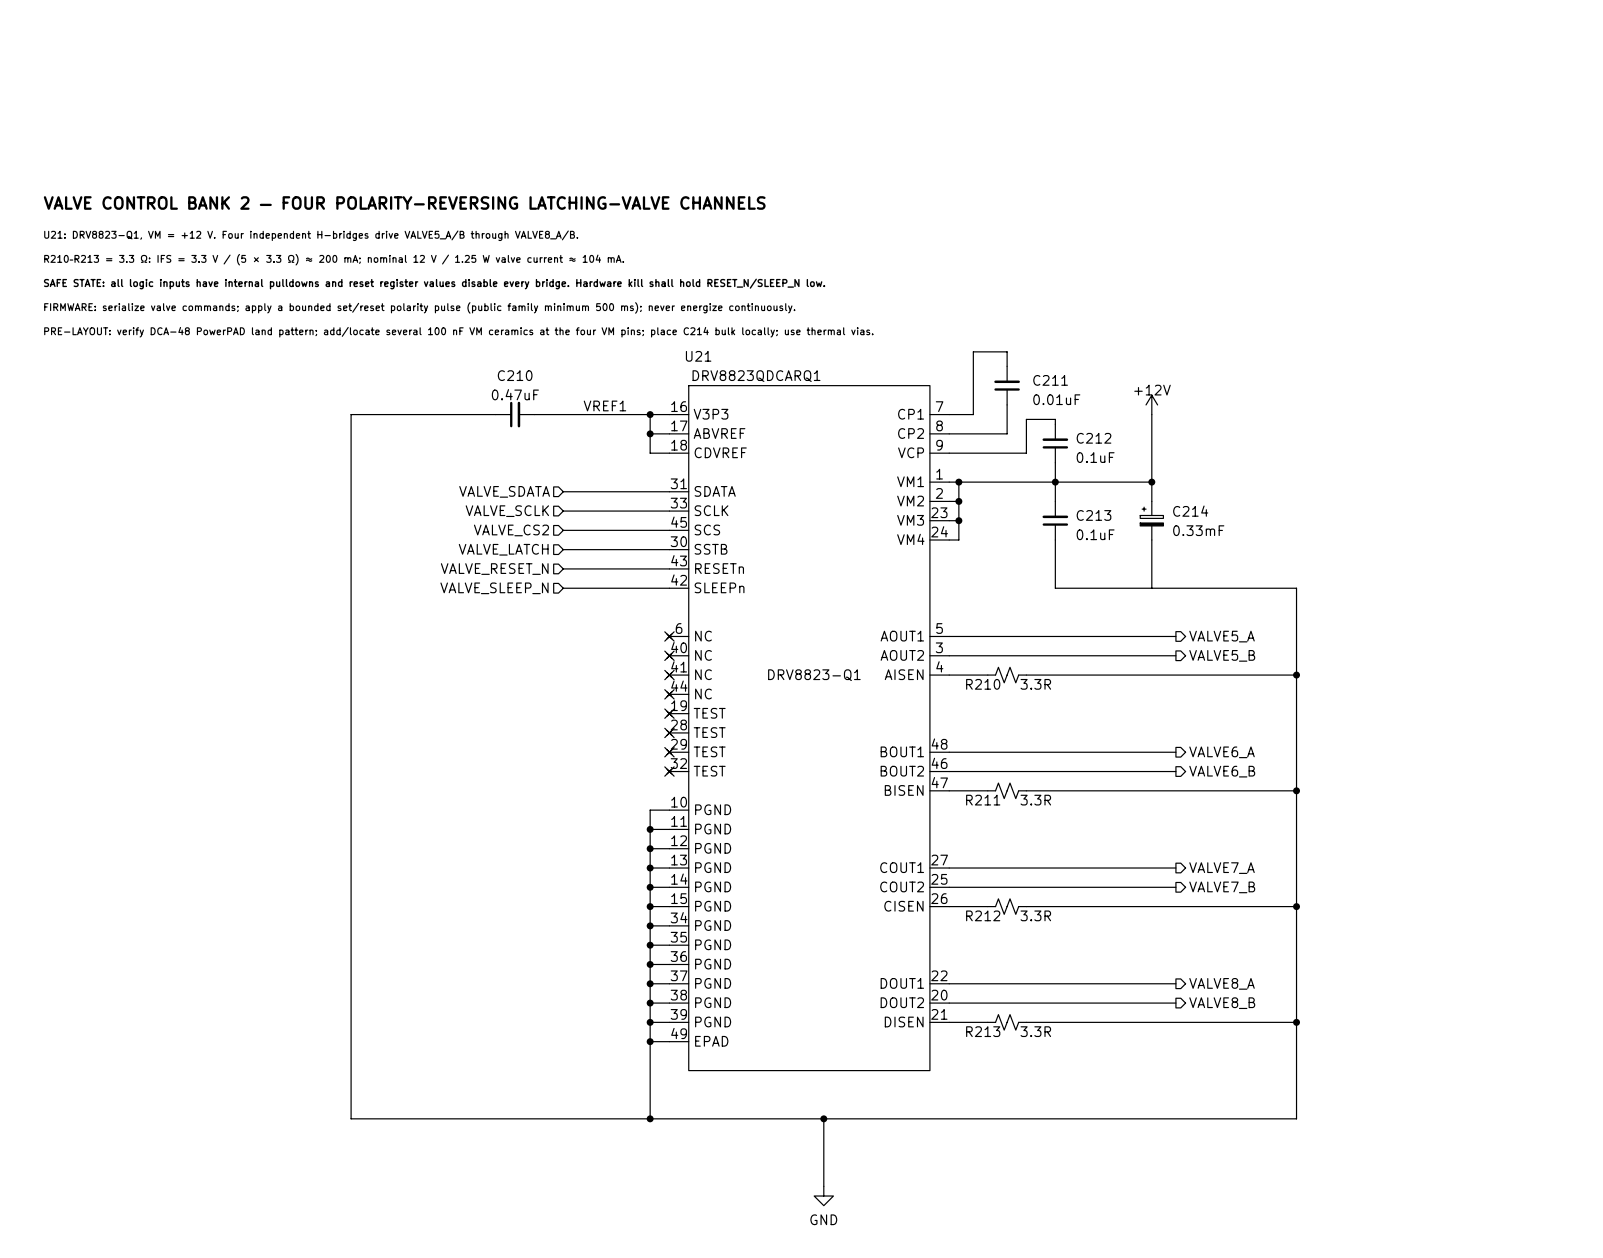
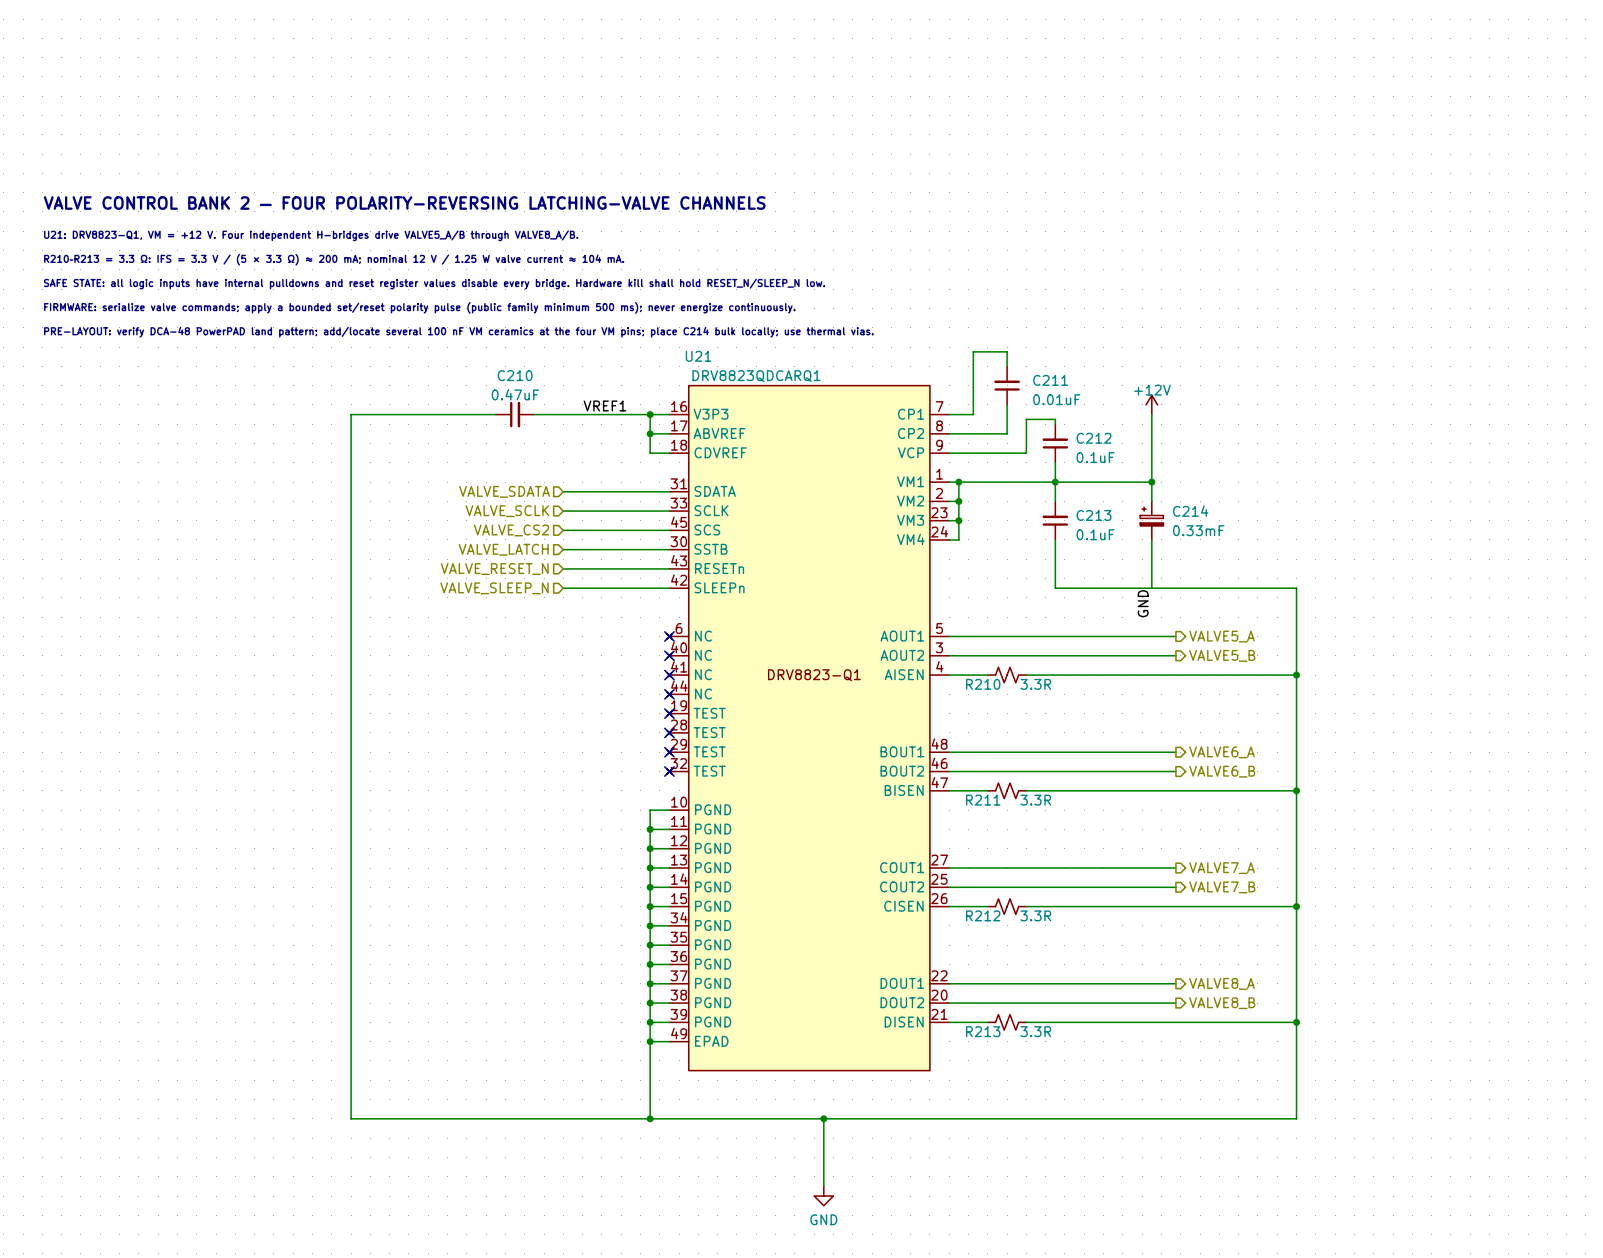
label: none -> GND (1143, 603)

